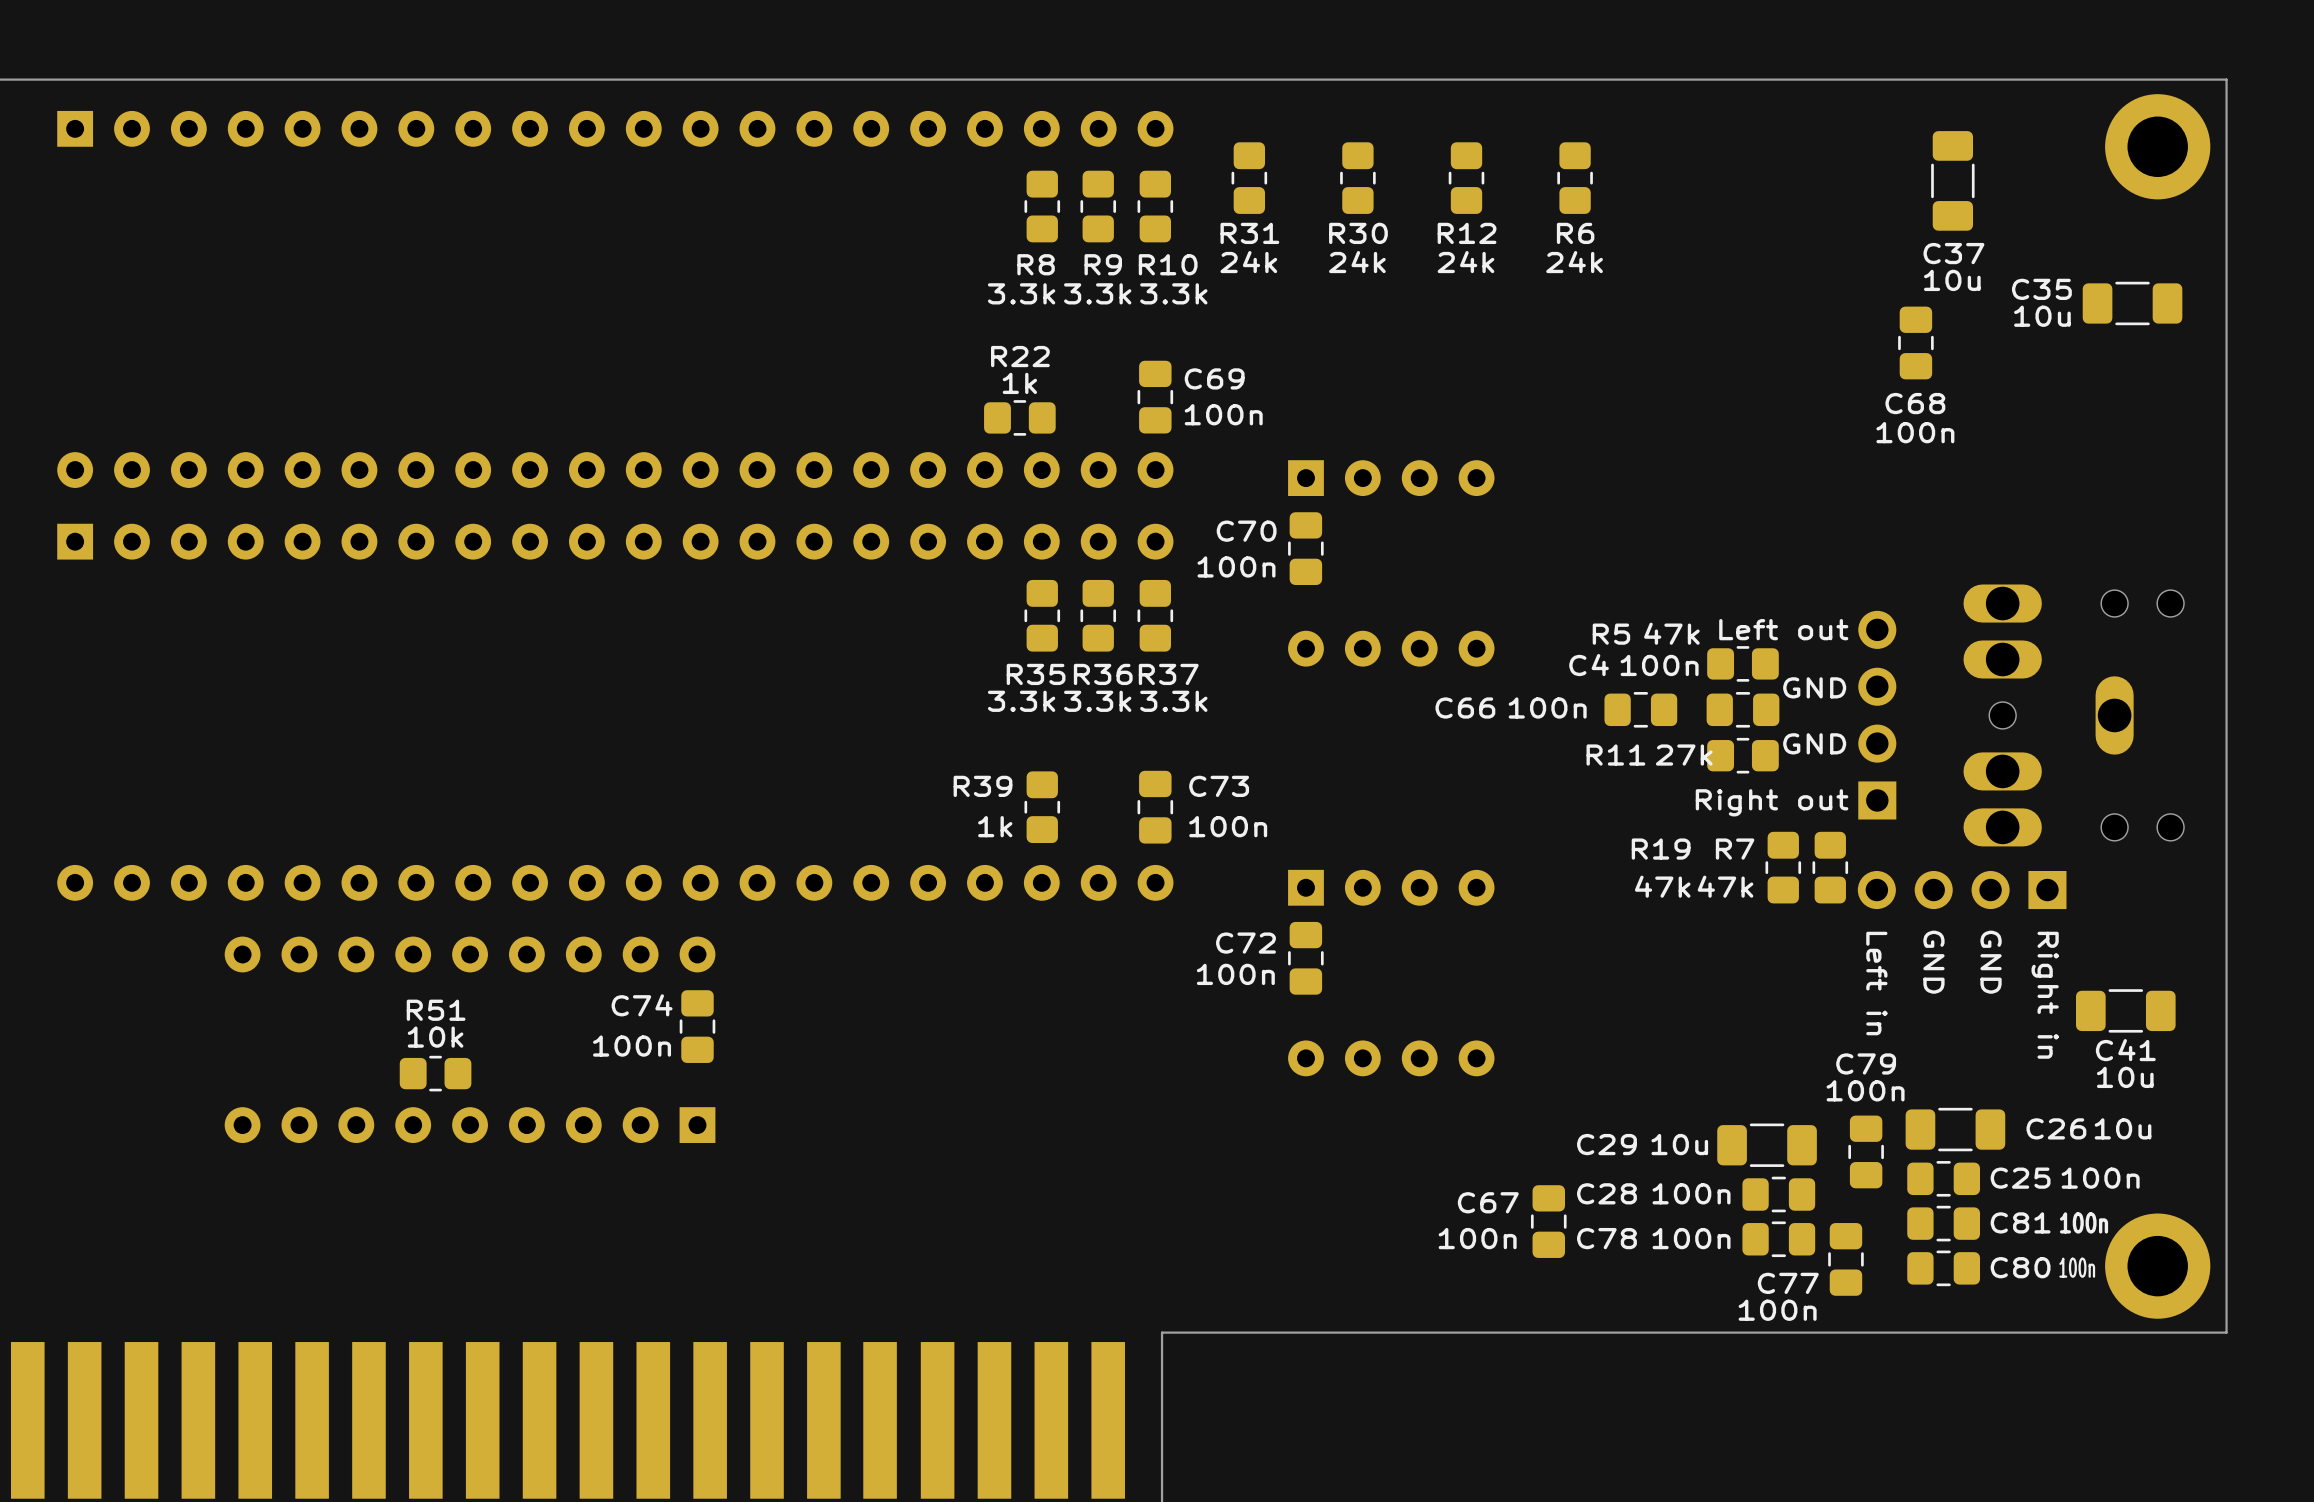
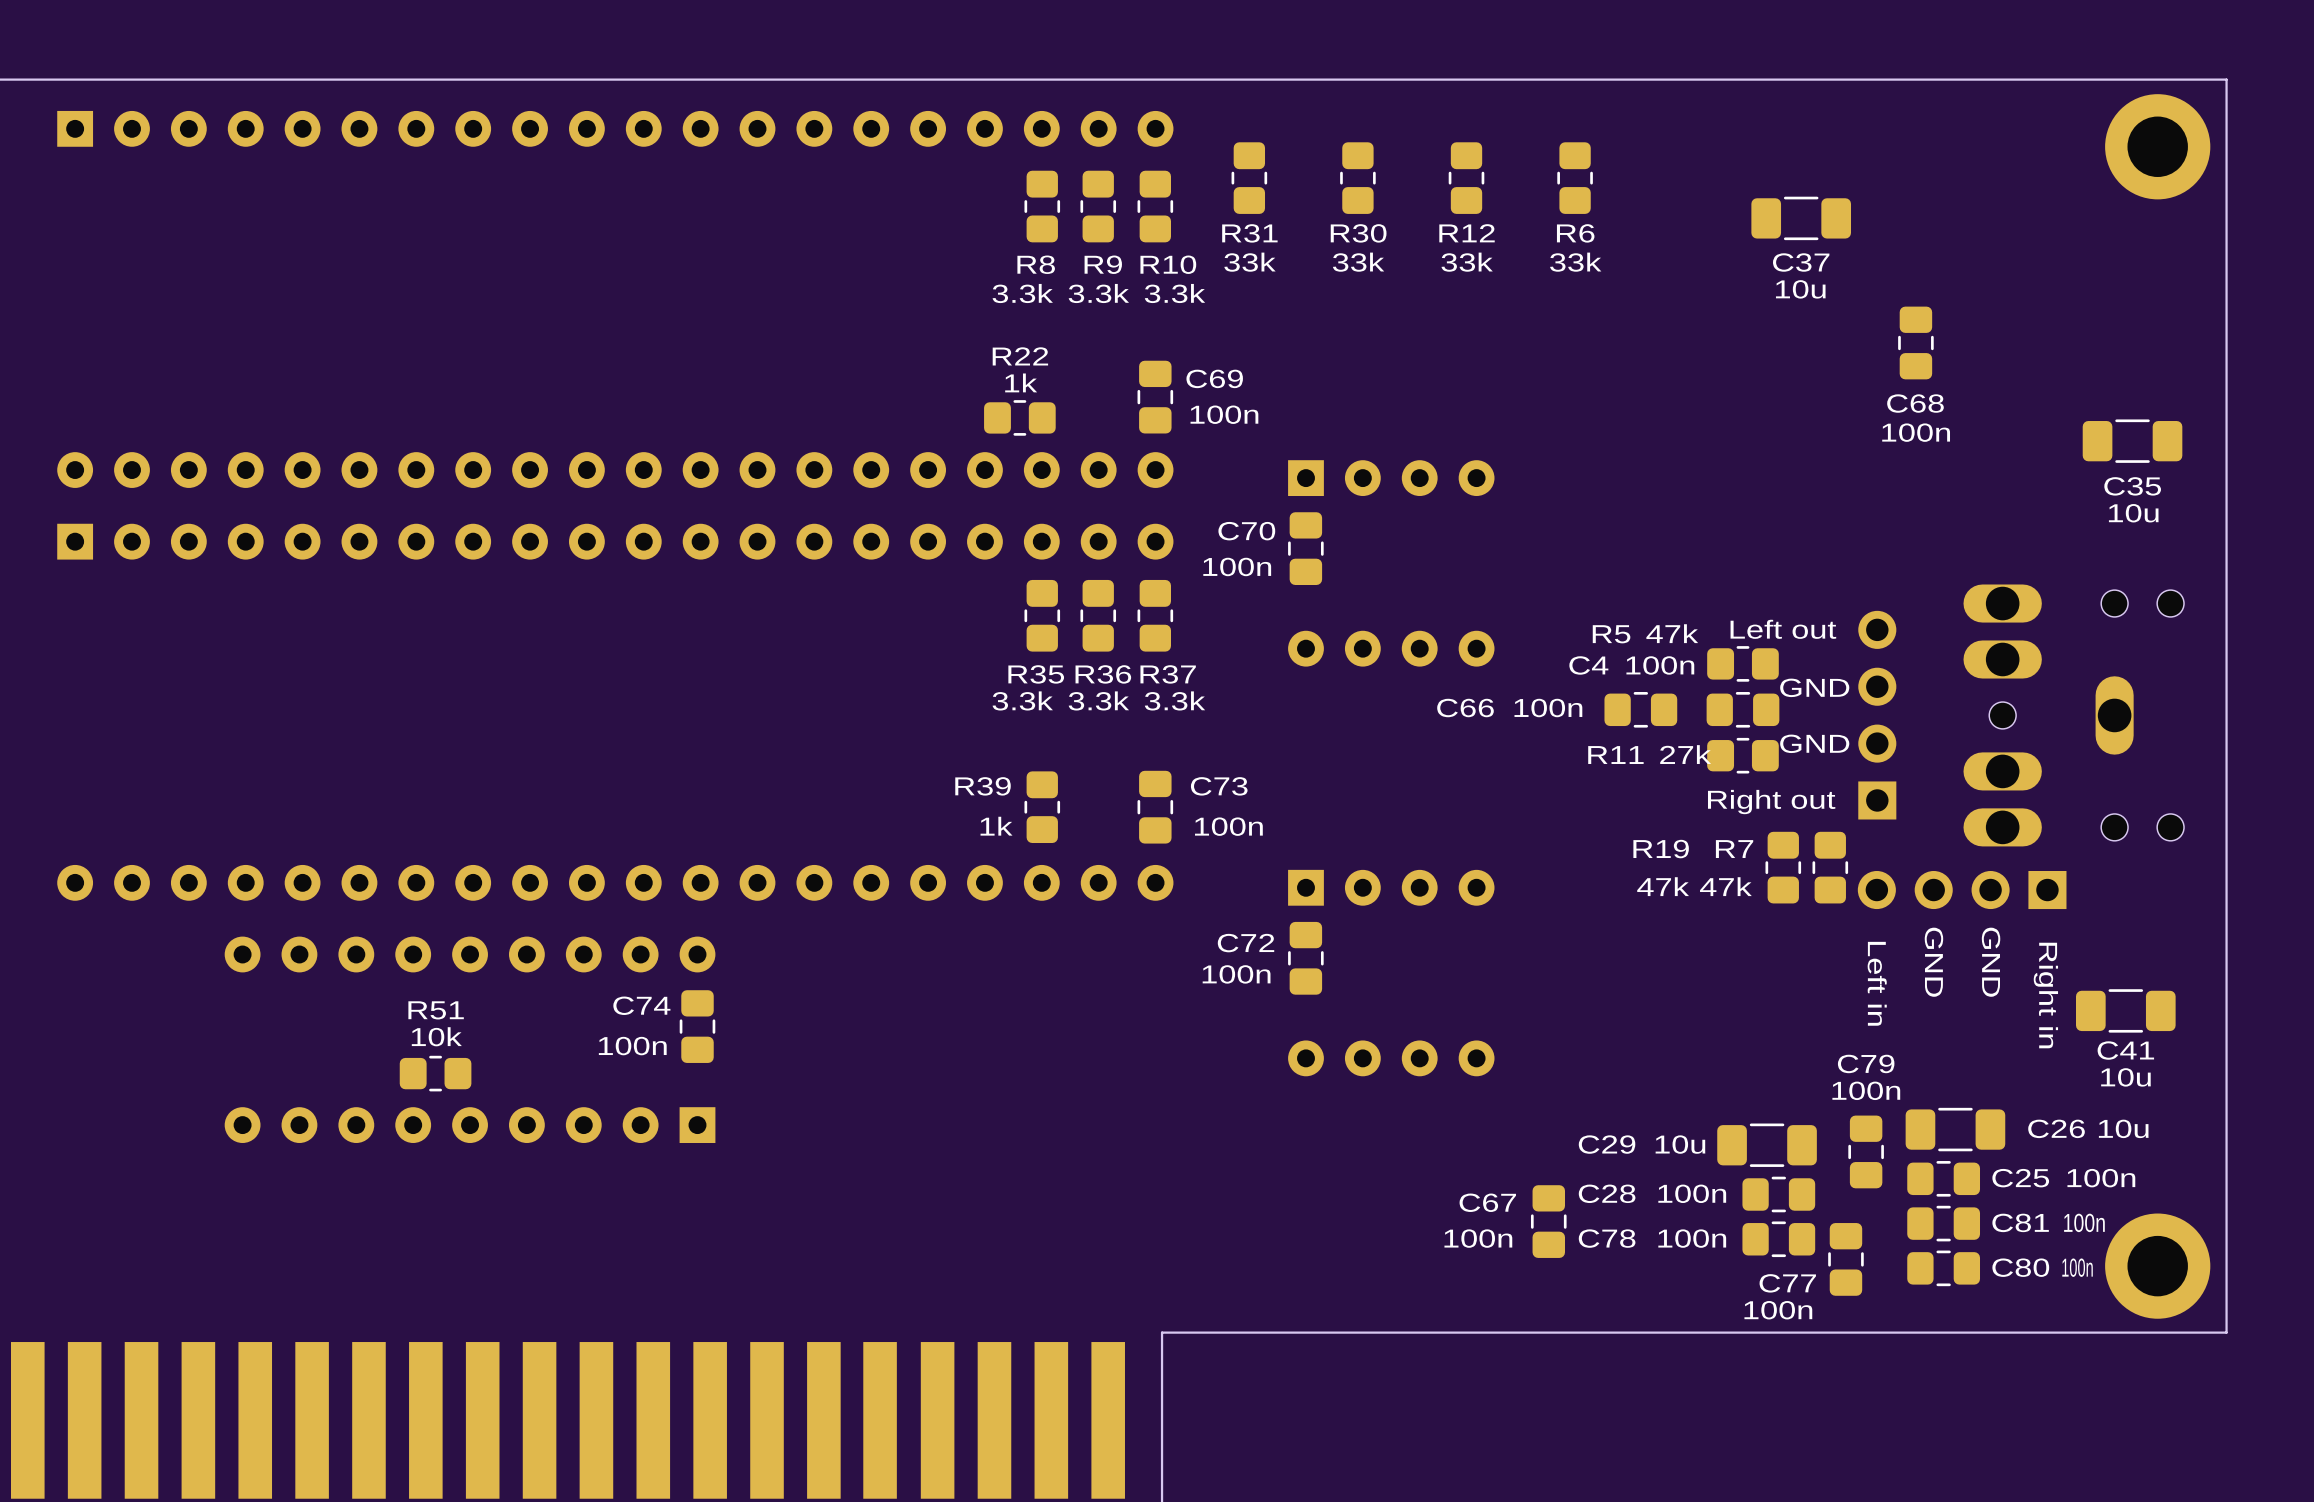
C37 rotation: 0° (1952, 180) -> 90° clockwise (1801, 218)
C37 position: (1952, 180) -> (1801, 218)
R31 value: 24k (1248, 262) -> 33k (1249, 262)
R30 value: 24k (1357, 262) -> 33k (1358, 262)
R12 value: 24k (1465, 262) -> 33k (1467, 262)
R6 value: 24k (1574, 262) -> 33k (1575, 262)
C35 name position: C35 (2041, 289) -> C35 (2132, 486)
C35 position: (2132, 303) -> (2132, 441)
C35 value position: 10u (2042, 316) -> 10u (2133, 513)

